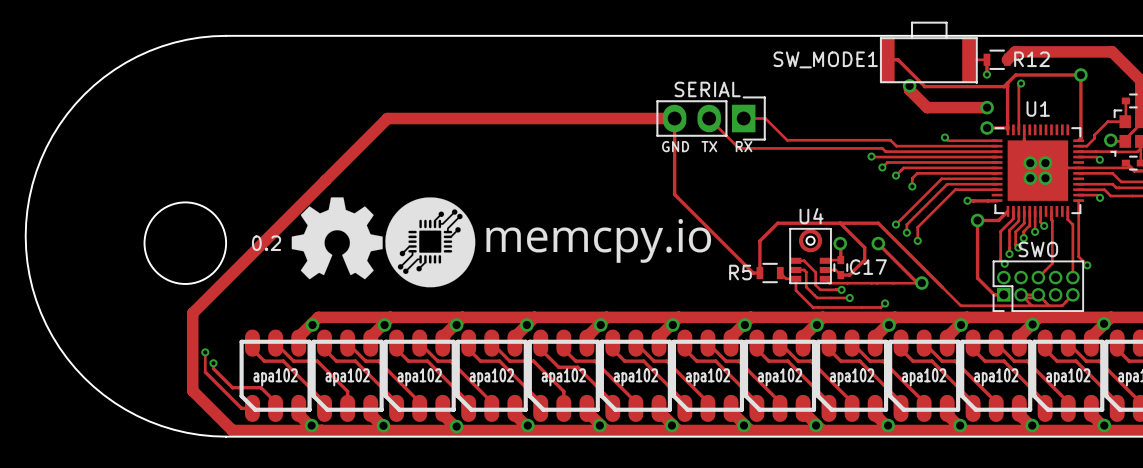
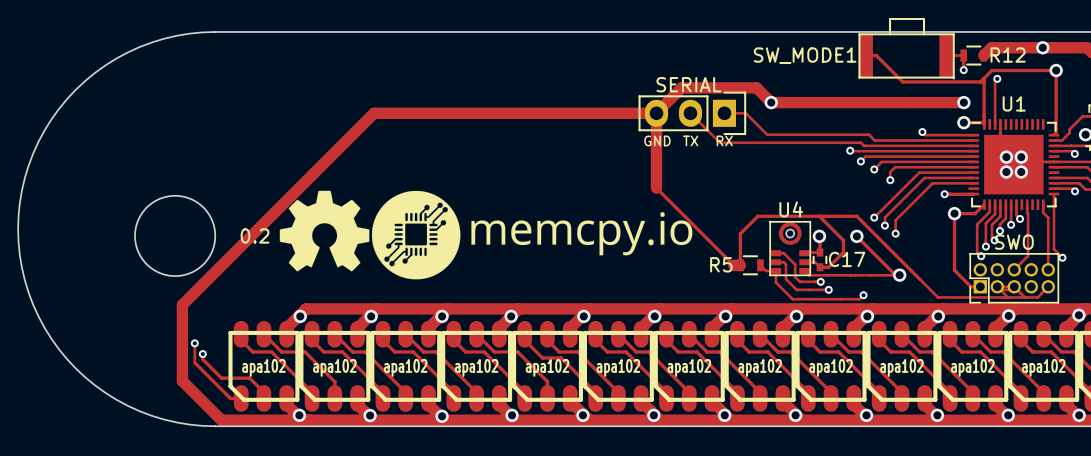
via: none -> (1042, 47)
track: (909, 85) (909, 89) (927, 107) -> (656, 113) (681, 87) (756, 87) (771, 102) (905, 102)
via: (909, 85) -> none
via: none -> (771, 102)
track width: thin (674, 118) (674, 194) -> thick (656, 113) (656, 188)
track width: thin (753, 273) (759, 273) -> thick (733, 265) (740, 265)

